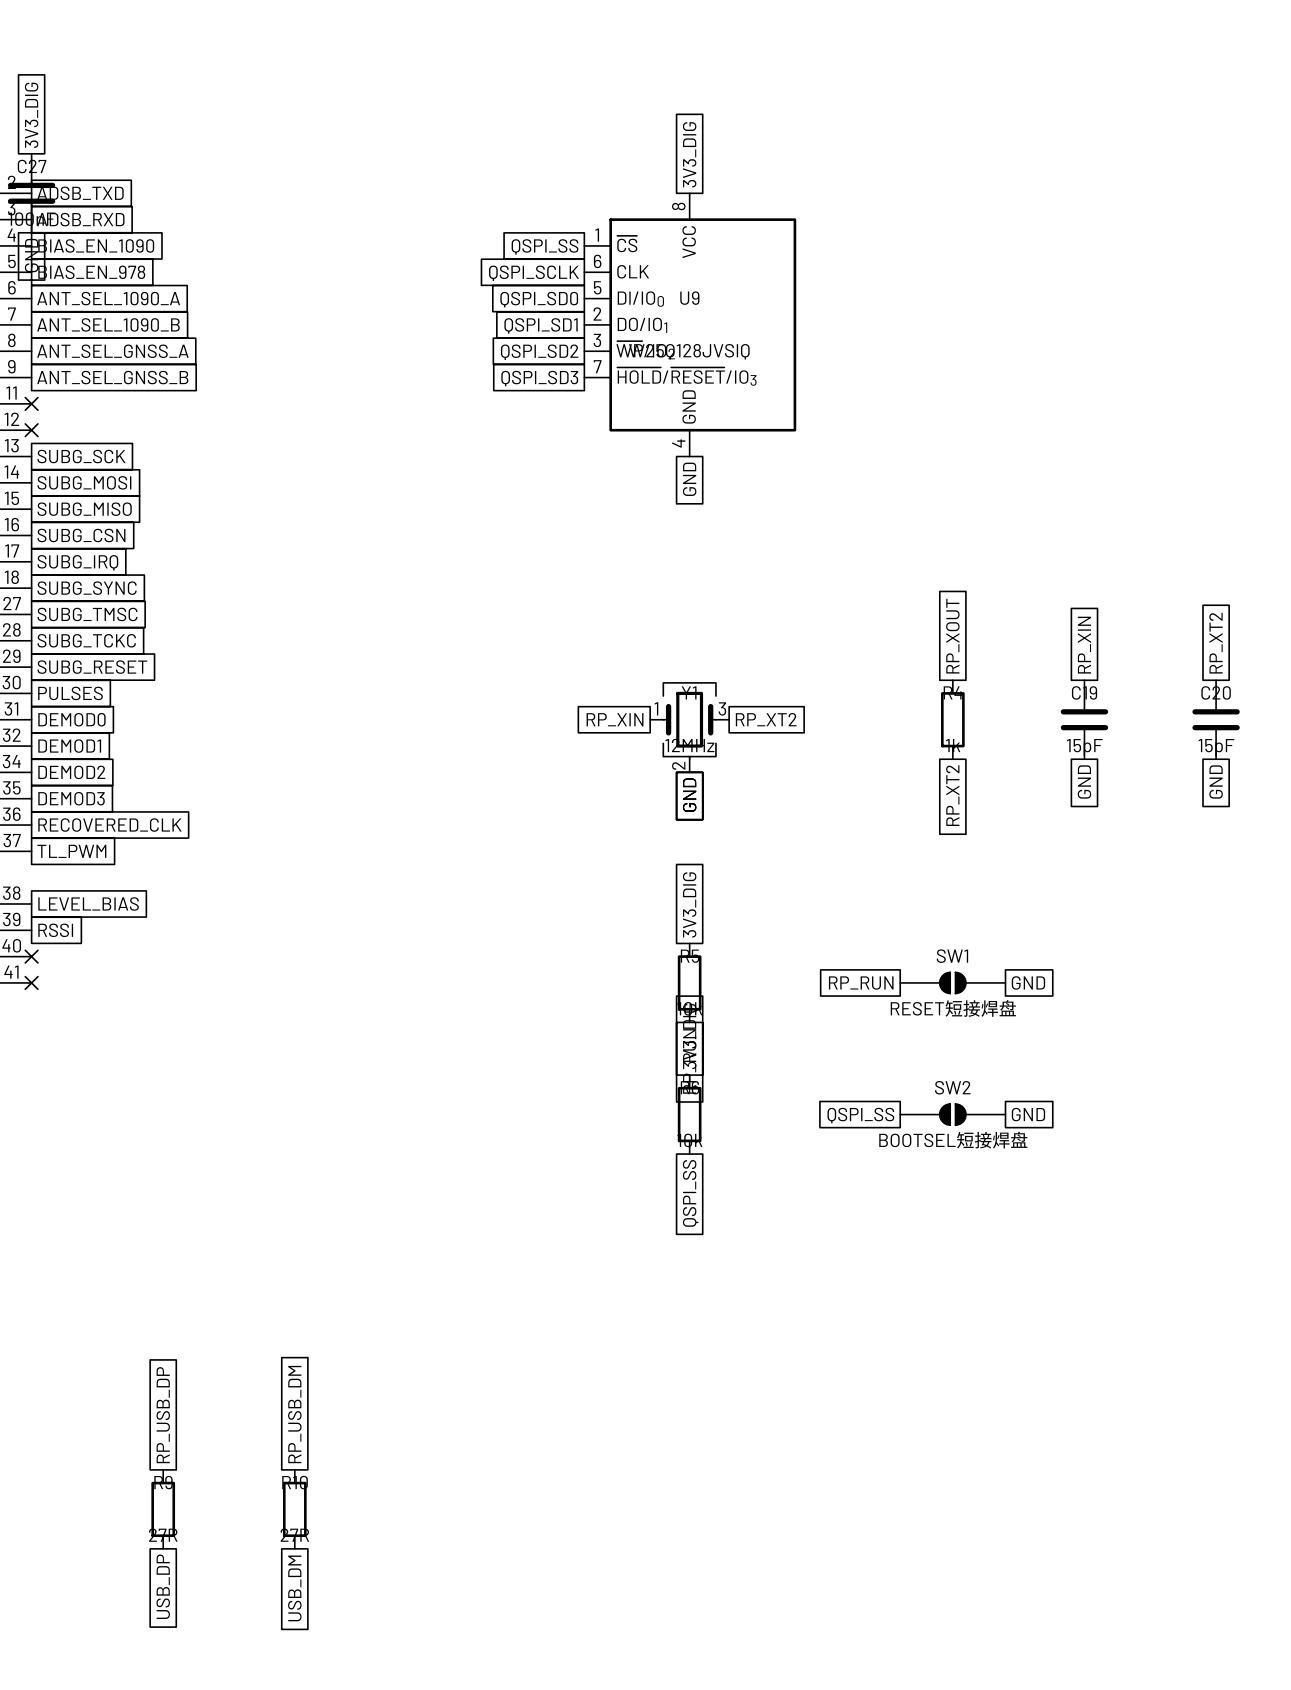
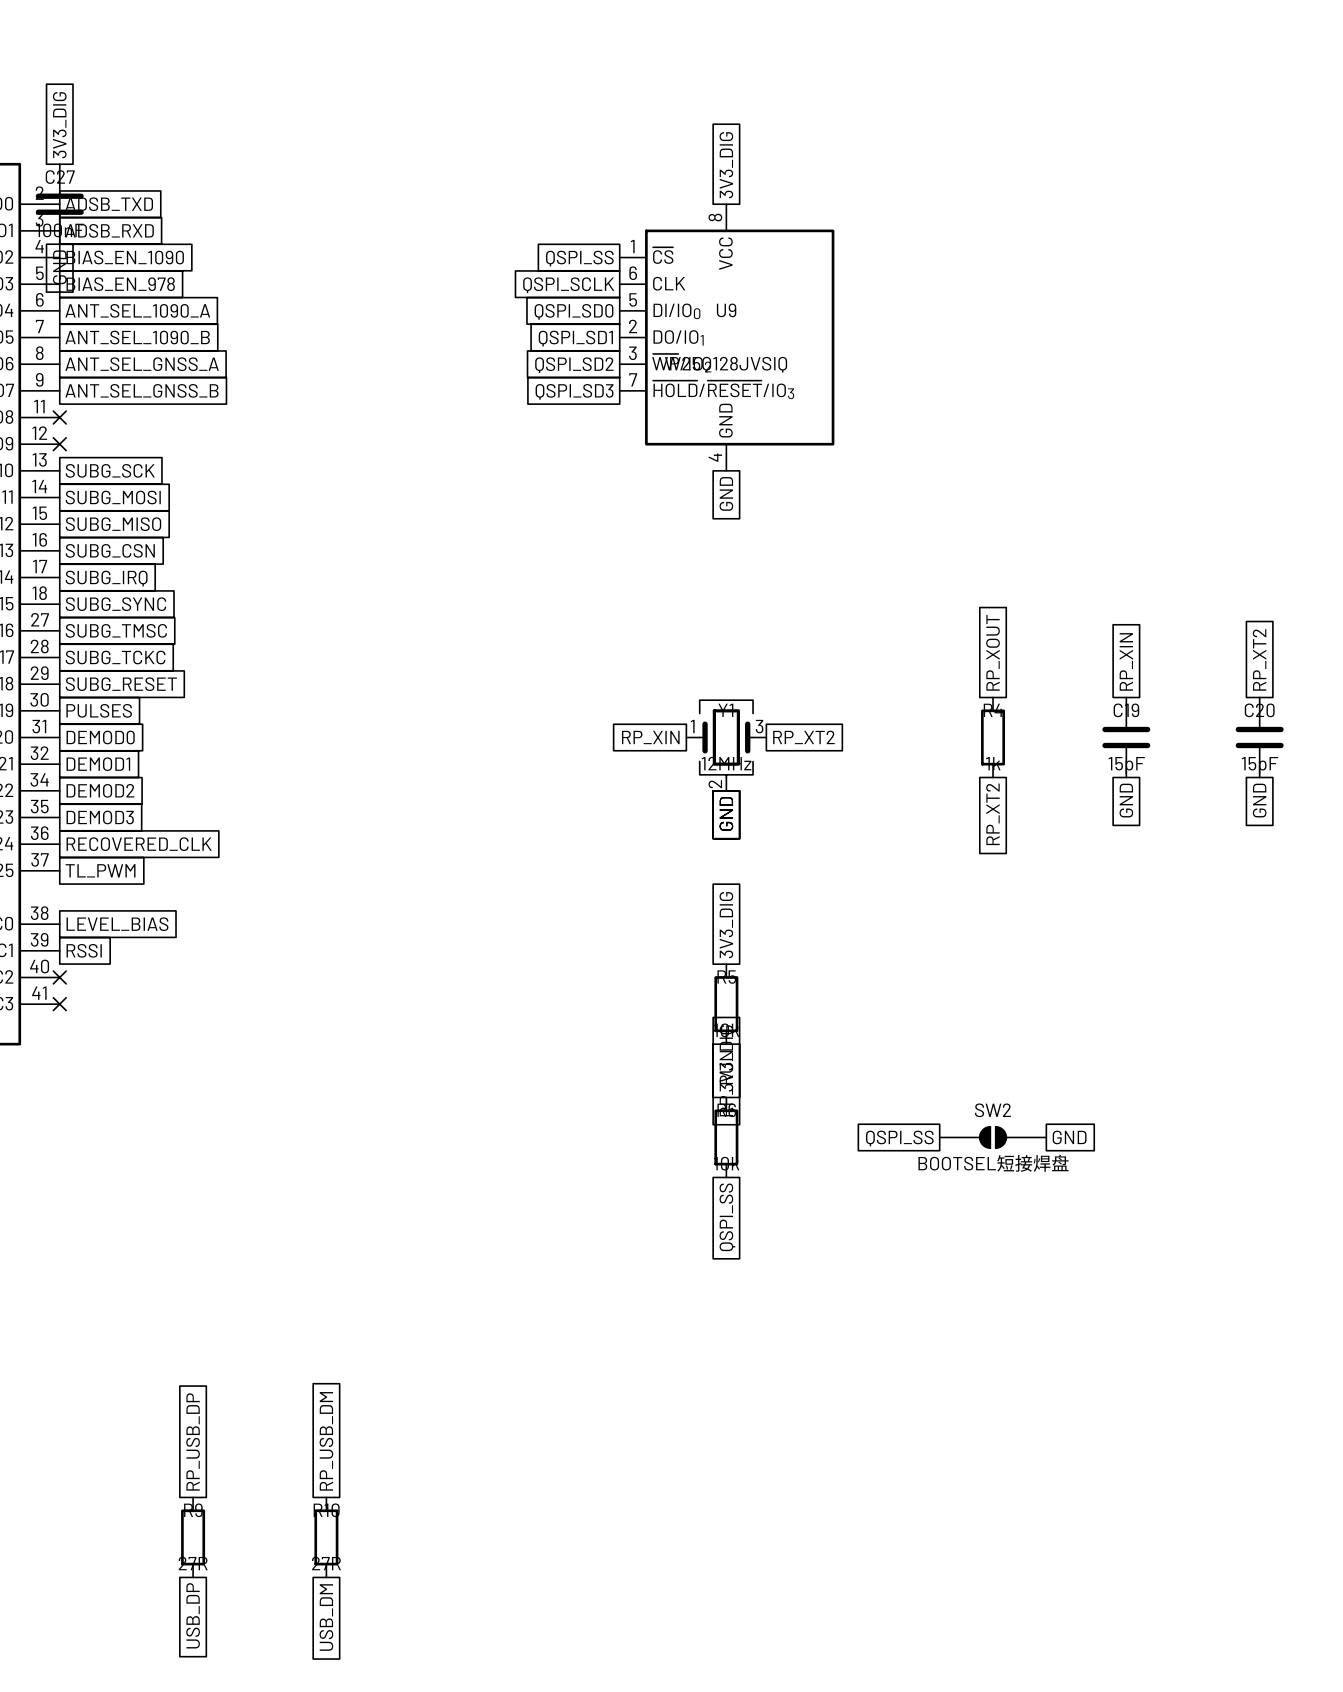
SW1: RESET短接焊盘 (952, 982) -> none
global label: GND (1028, 982) -> none
global label: RP_RUN (861, 983) -> none

